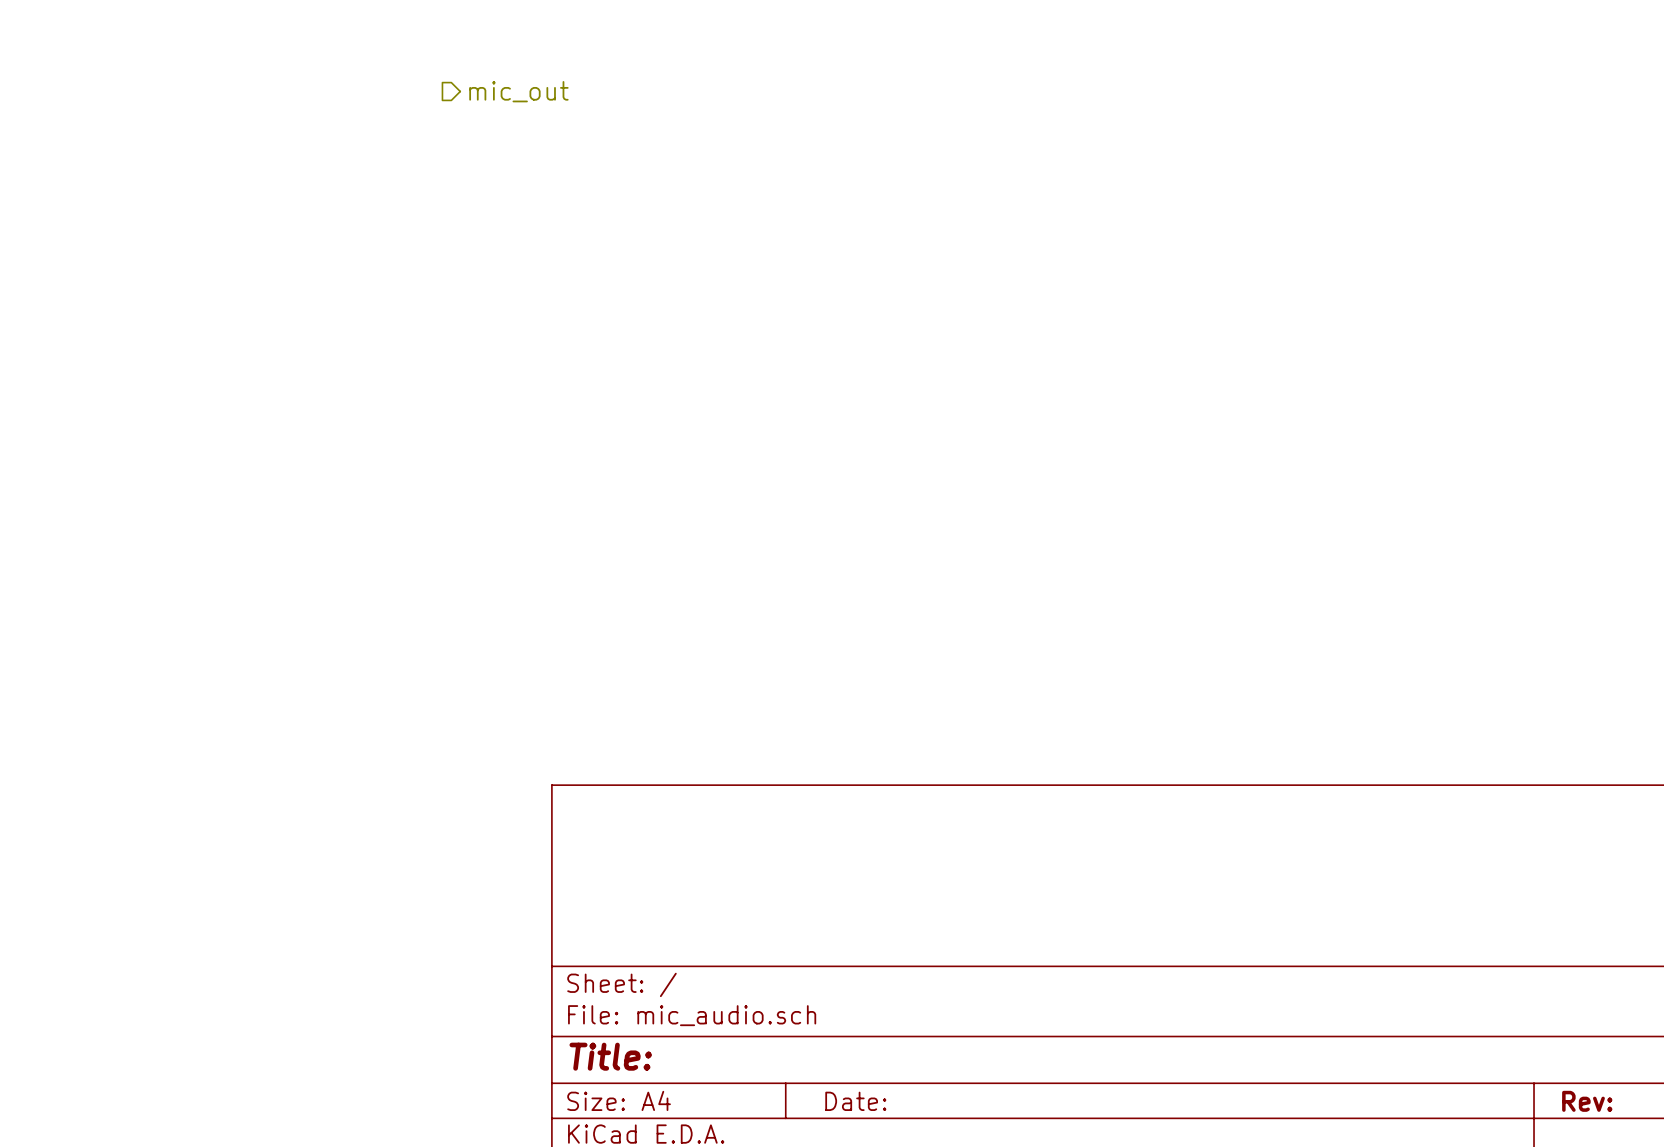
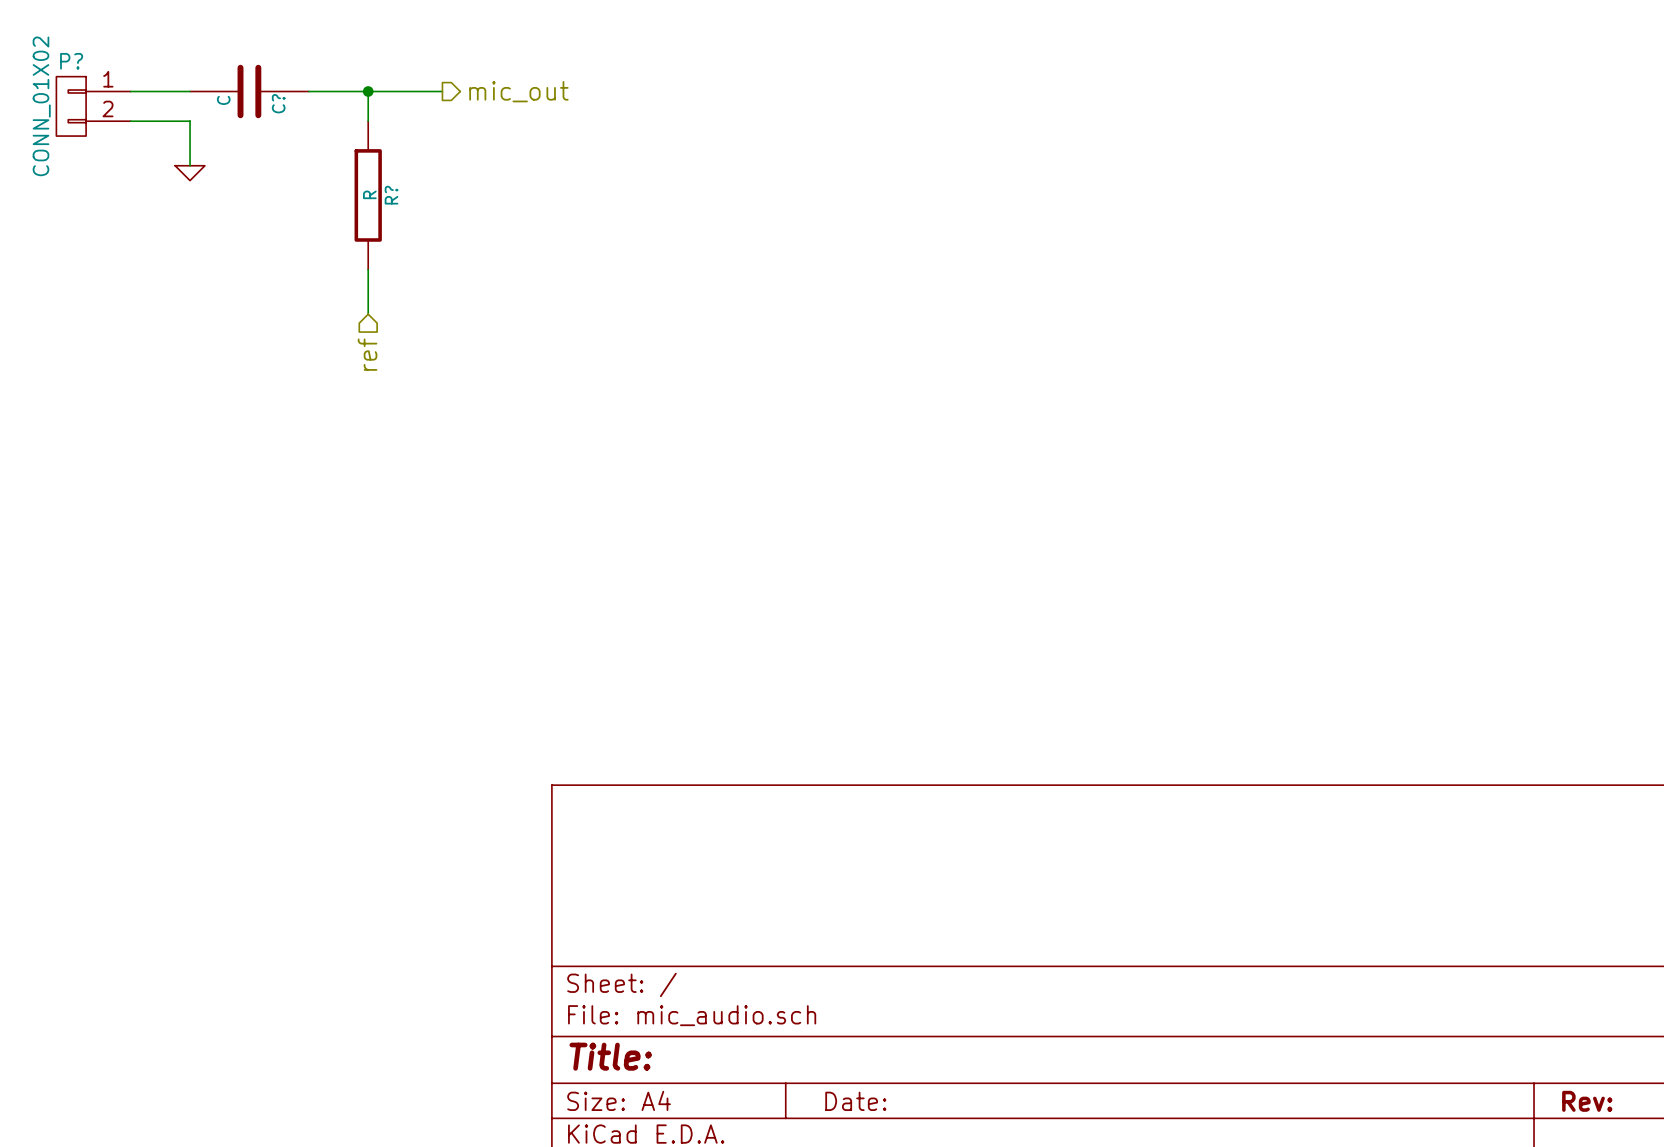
wire: none -> (130, 91) (190, 91)
C?: none -> C (249, 91)
wire: none -> (308, 91) (442, 91)
wire: none -> (368, 91) (368, 121)
junction: none -> (368, 91)
P?: none -> CONN_01X02 (93, 106)
wire: none -> (130, 121) (190, 121) (190, 165)
power symbol: none -> (190, 173)
R?: none -> R (368, 195)
wire: none -> (368, 269) (368, 314)
hierarchical label: none -> ref (367, 354)

